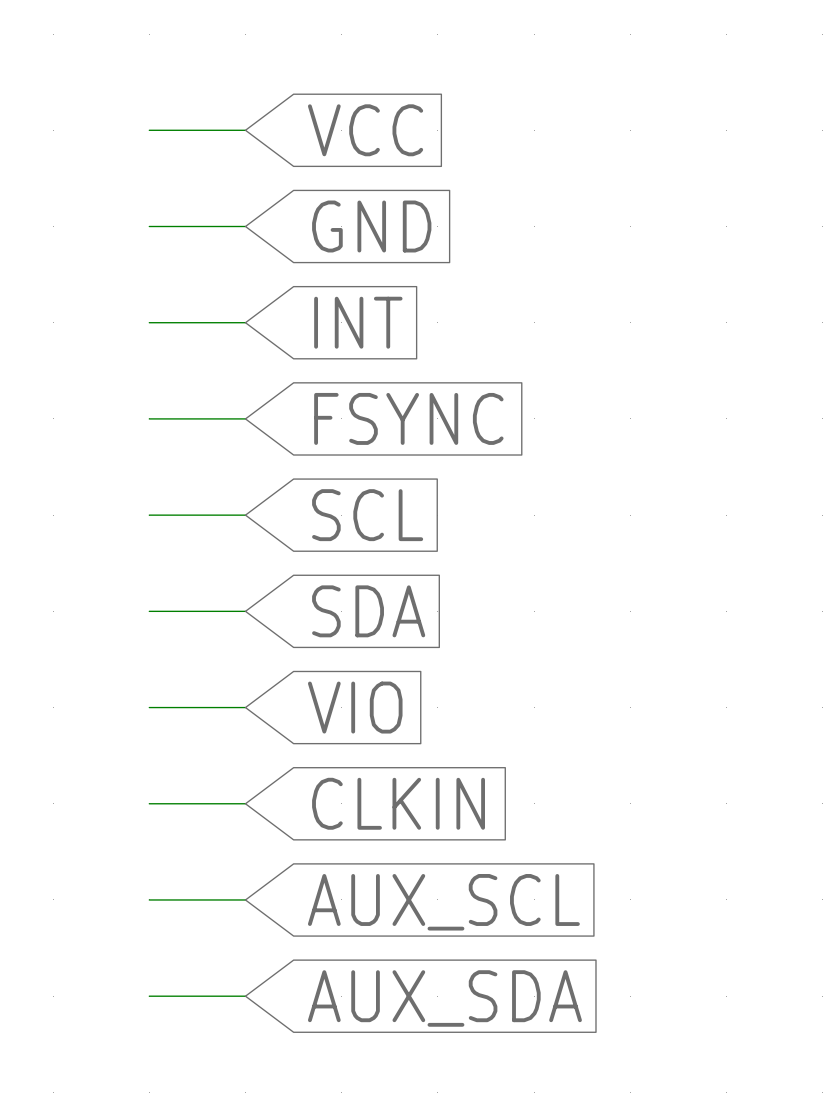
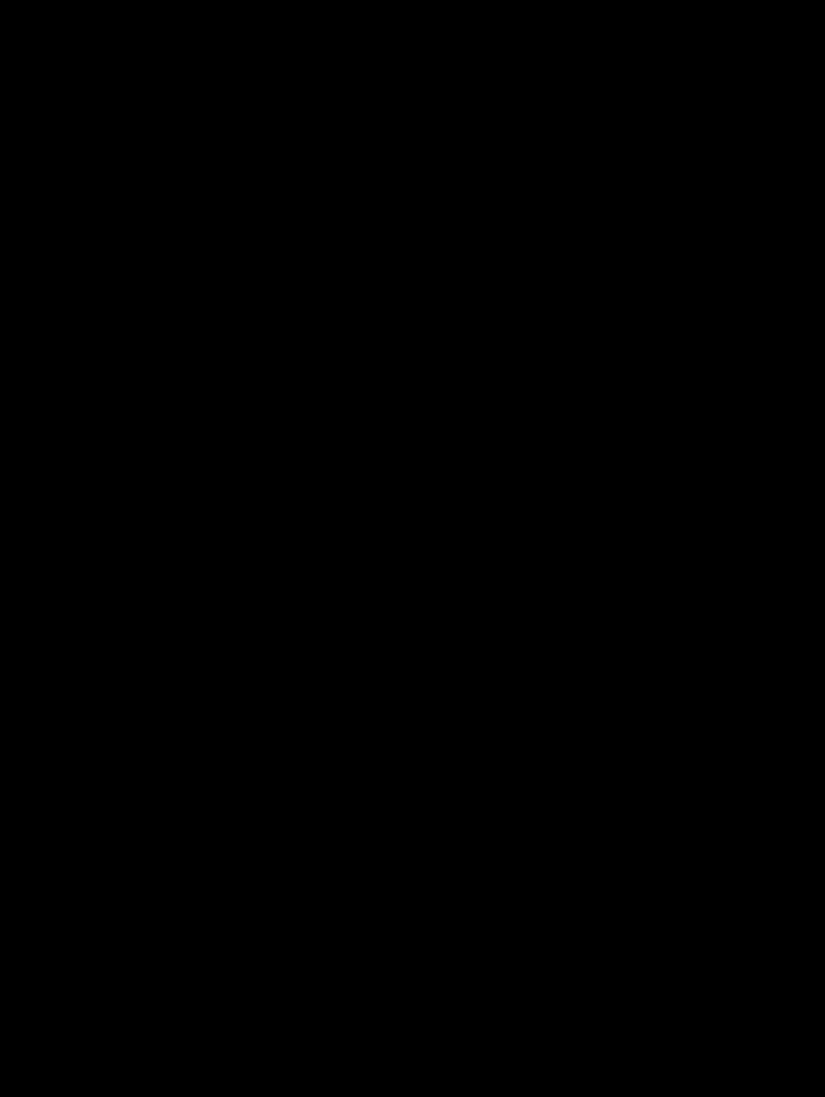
wire: (149, 130) (245, 130) -> none
global label: VCC (365, 130) -> none
wire: (149, 226) (245, 226) -> none
global label: GND (371, 226) -> none
wire: (149, 322) (245, 322) -> none
global label: INT (358, 322) -> none
wire: (149, 418) (245, 418) -> none
global label: FSYNC (408, 418) -> none
wire: (149, 515) (245, 515) -> none
global label: SCL (367, 515) -> none
wire: (149, 611) (245, 611) -> none
global label: SDA (368, 611) -> none
wire: (149, 707) (245, 707) -> none
global label: VIO (355, 707) -> none
wire: (149, 803) (245, 803) -> none
global label: CLKIN (398, 803) -> none
wire: (149, 899) (245, 899) -> none
global label: AUX_SCL (443, 902) -> none
wire: (149, 996) (245, 996) -> none
global label: AUX_SDA (444, 998) -> none

